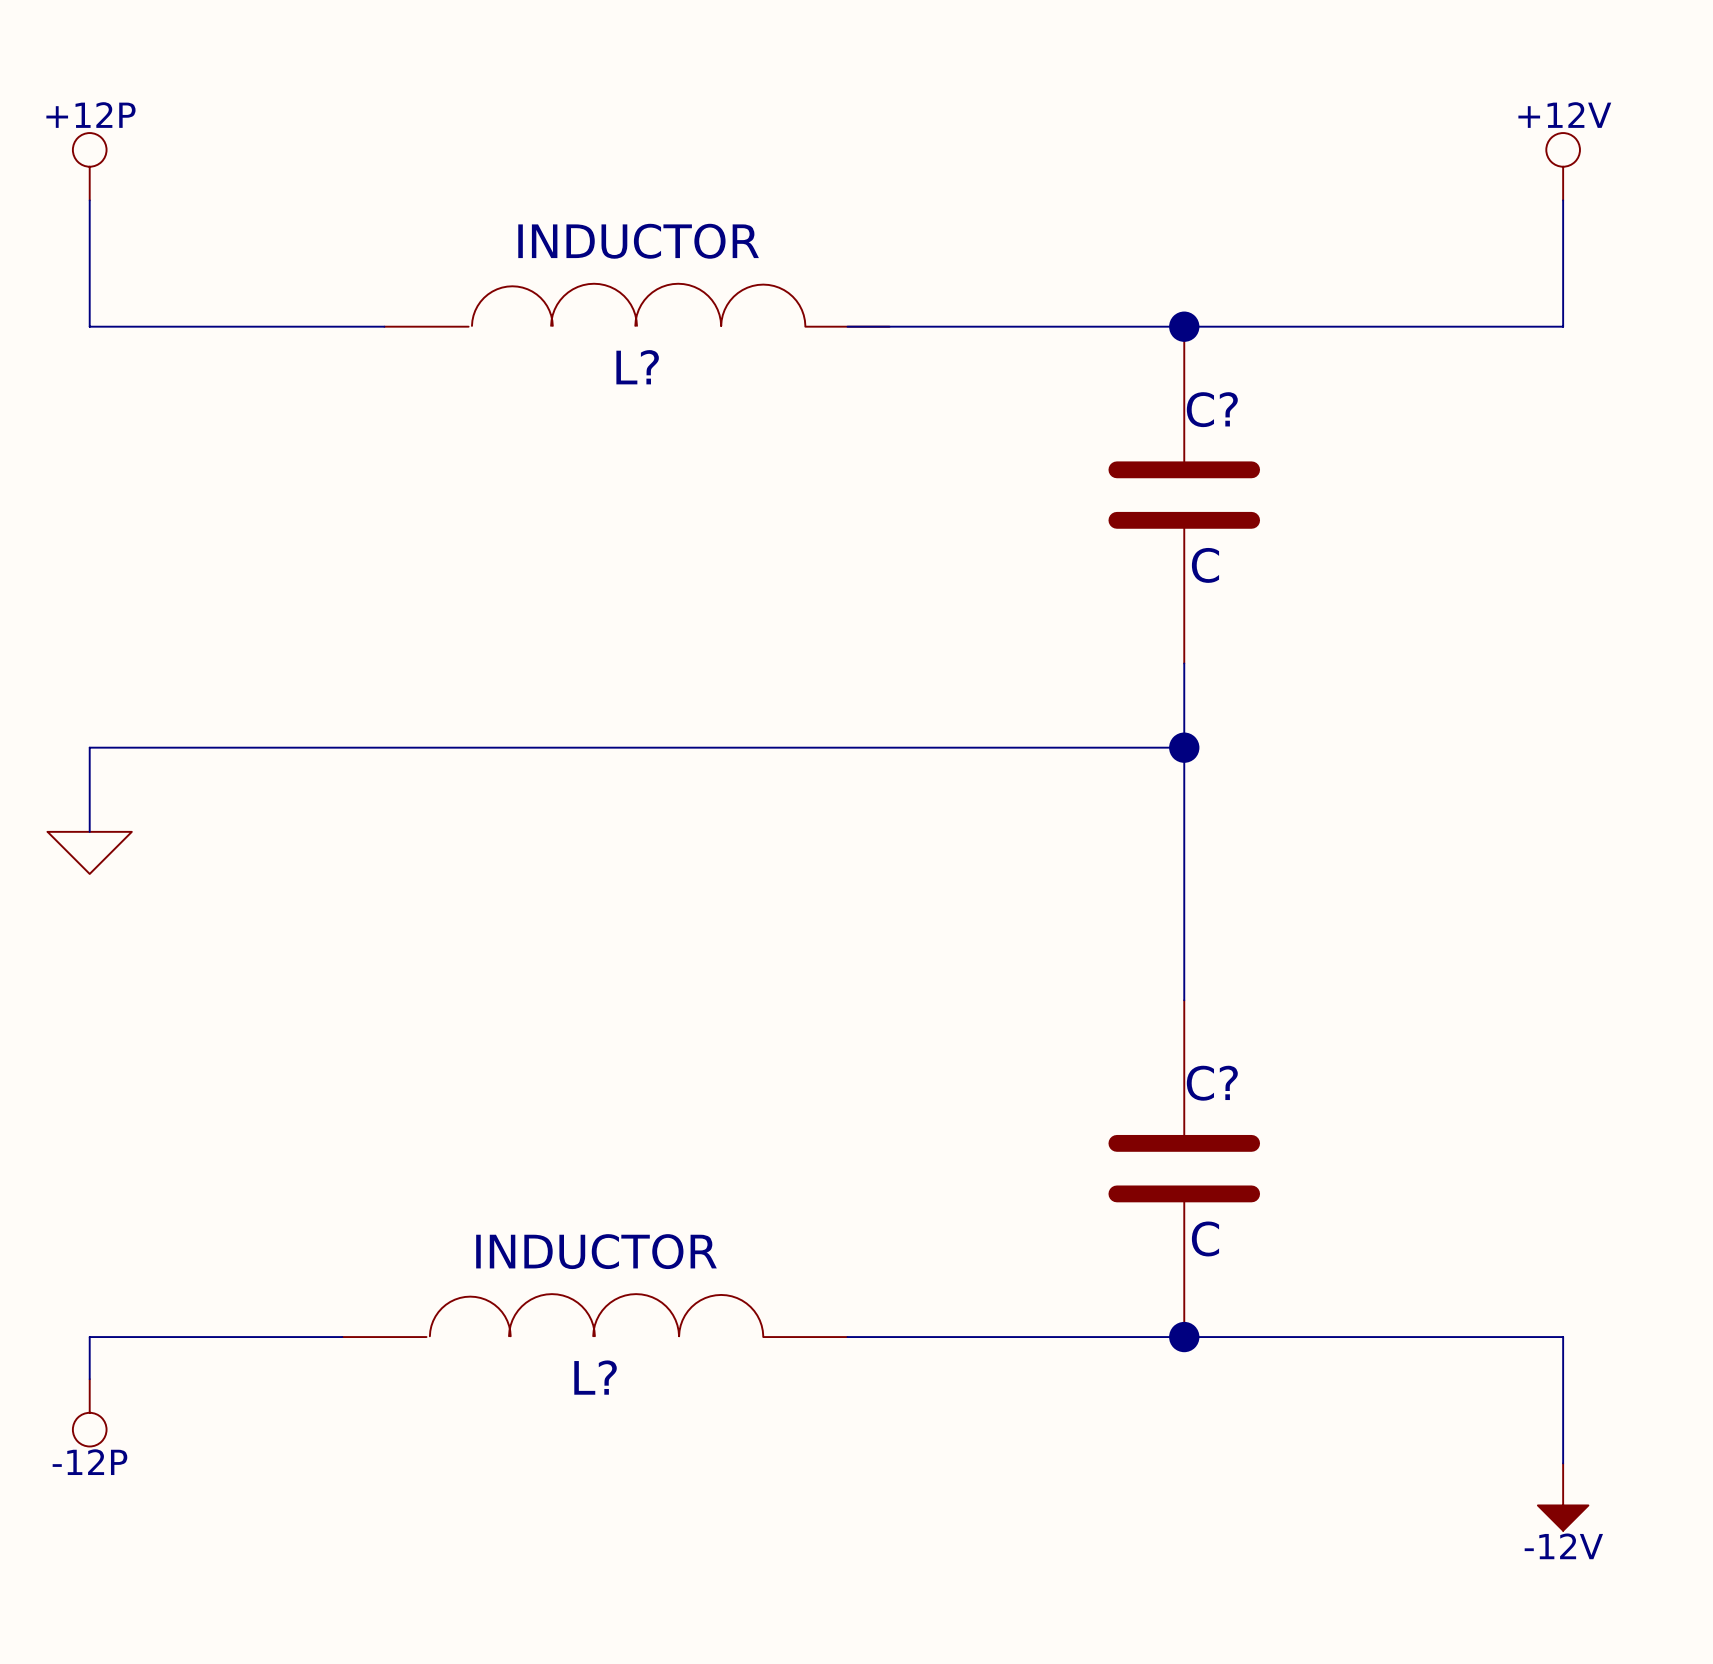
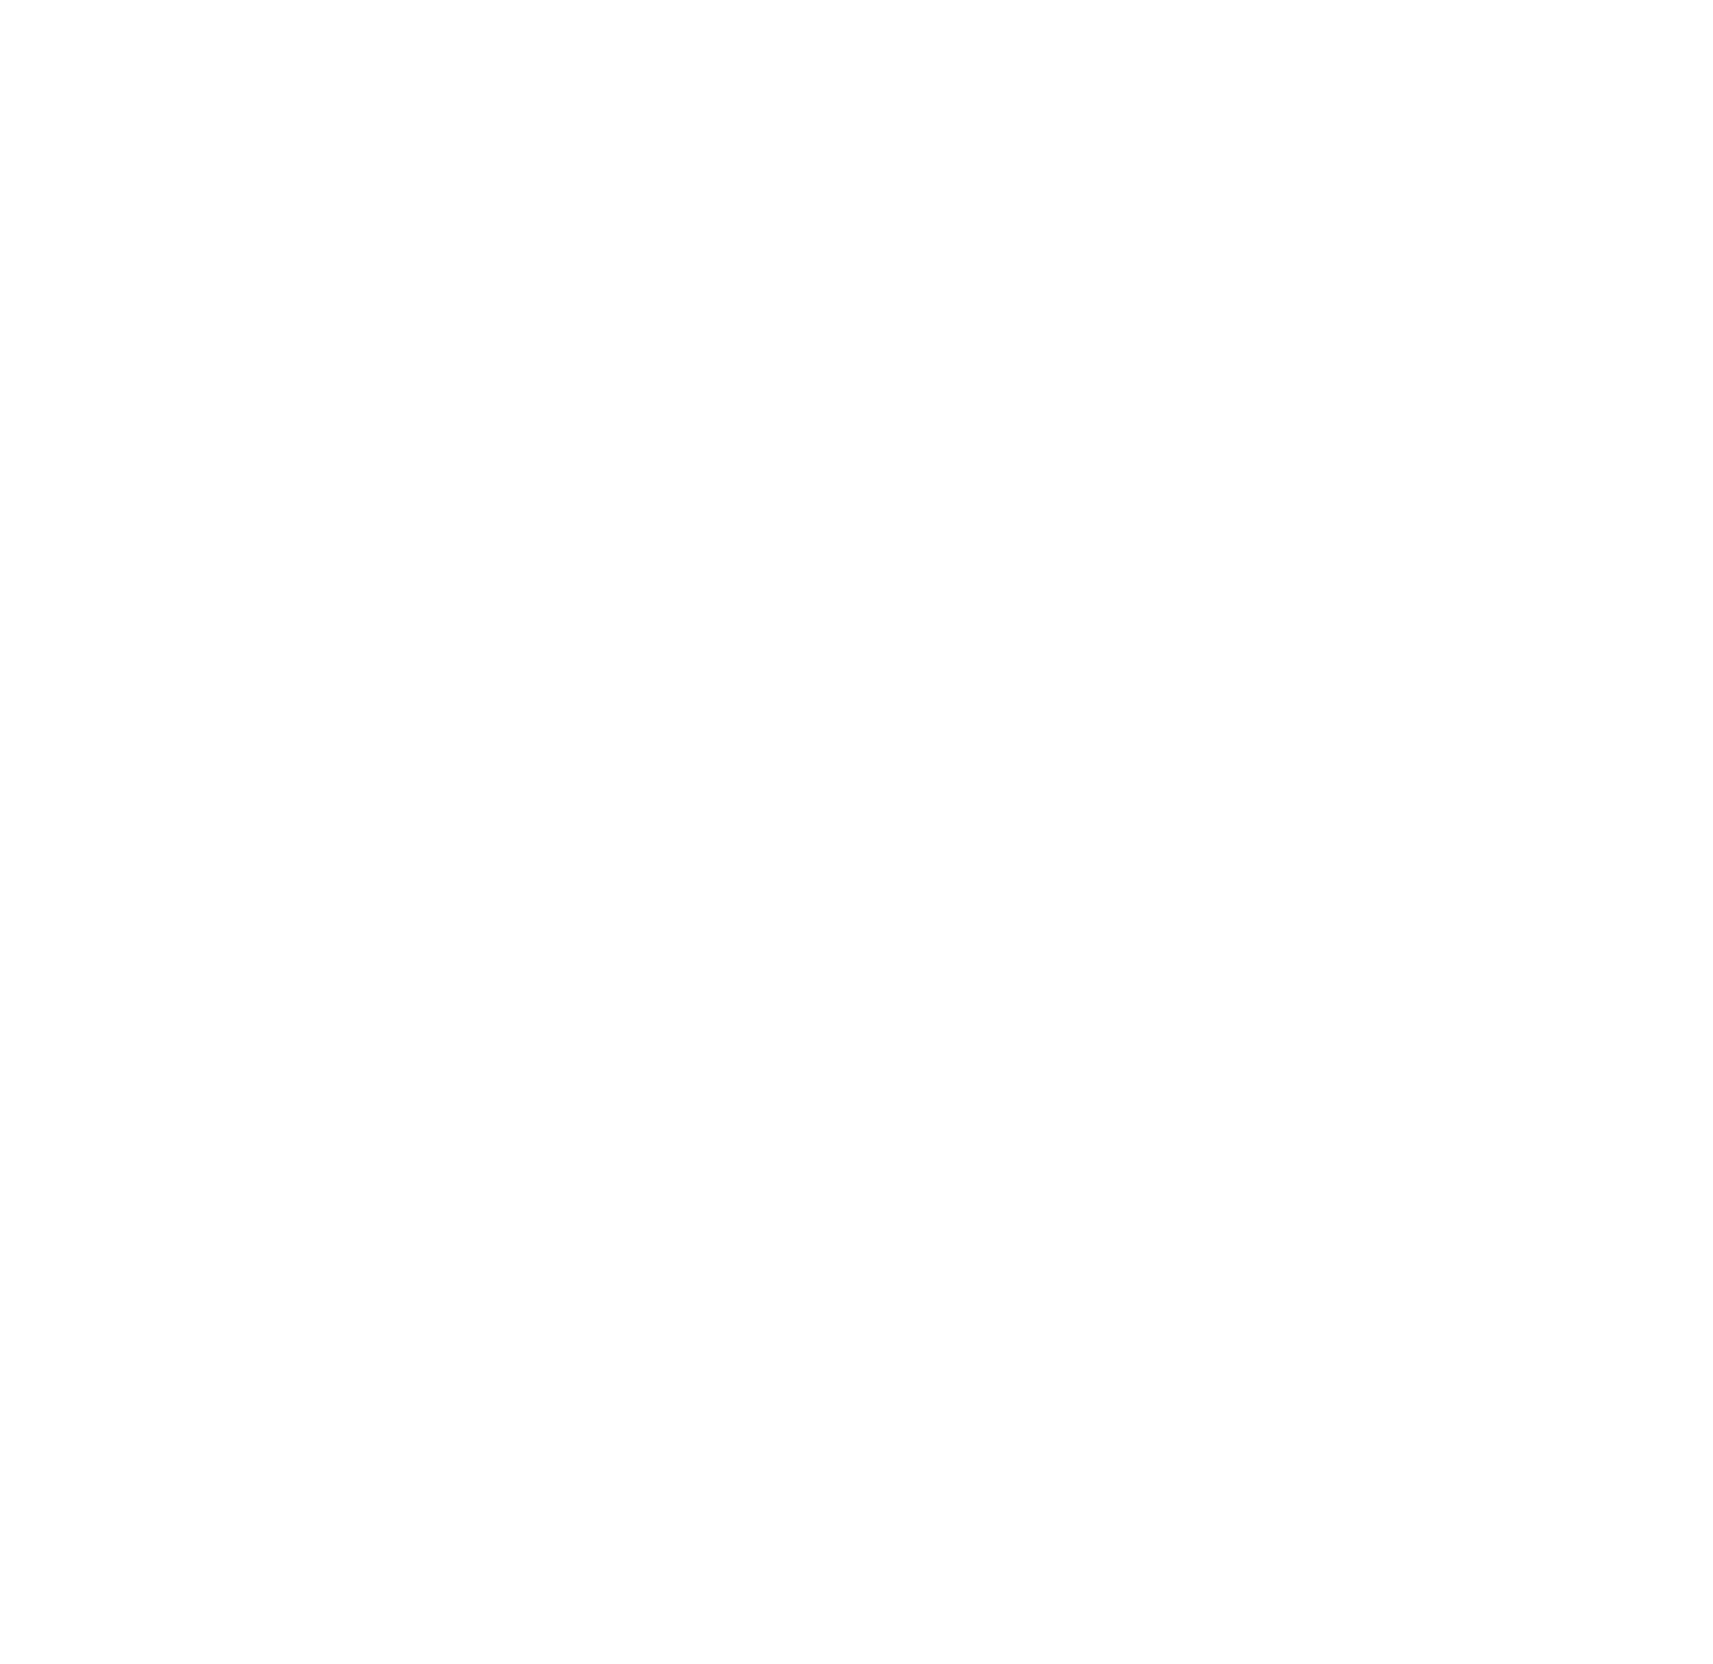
power symbol: +12P (89, 166) -> none
power symbol: +12V (1563, 166) -> none
wire: (89, 200) (89, 326) (384, 326) -> none
wire: (1563, 200) (1563, 326) (847, 326) -> none
L?: INDUCTOR (636, 305) -> none
junction: (1184, 326) -> none
C?: C (1184, 495) -> none
wire: (1184, 663) (1184, 1000) -> none
wire: (1184, 747) (89, 747) (89, 831) -> none
junction: (1184, 747) -> none
power symbol: (89, 852) -> none
C?: C (1184, 1168) -> none
L?: INDUCTOR (594, 1315) -> none
wire: (342, 1337) (89, 1337) (89, 1379) -> none
wire: (847, 1337) (1563, 1337) (1563, 1463) -> none
junction: (1184, 1337) -> none
power symbol: -12P (89, 1412) -> none
power symbol: -12V (1563, 1497) -> none

